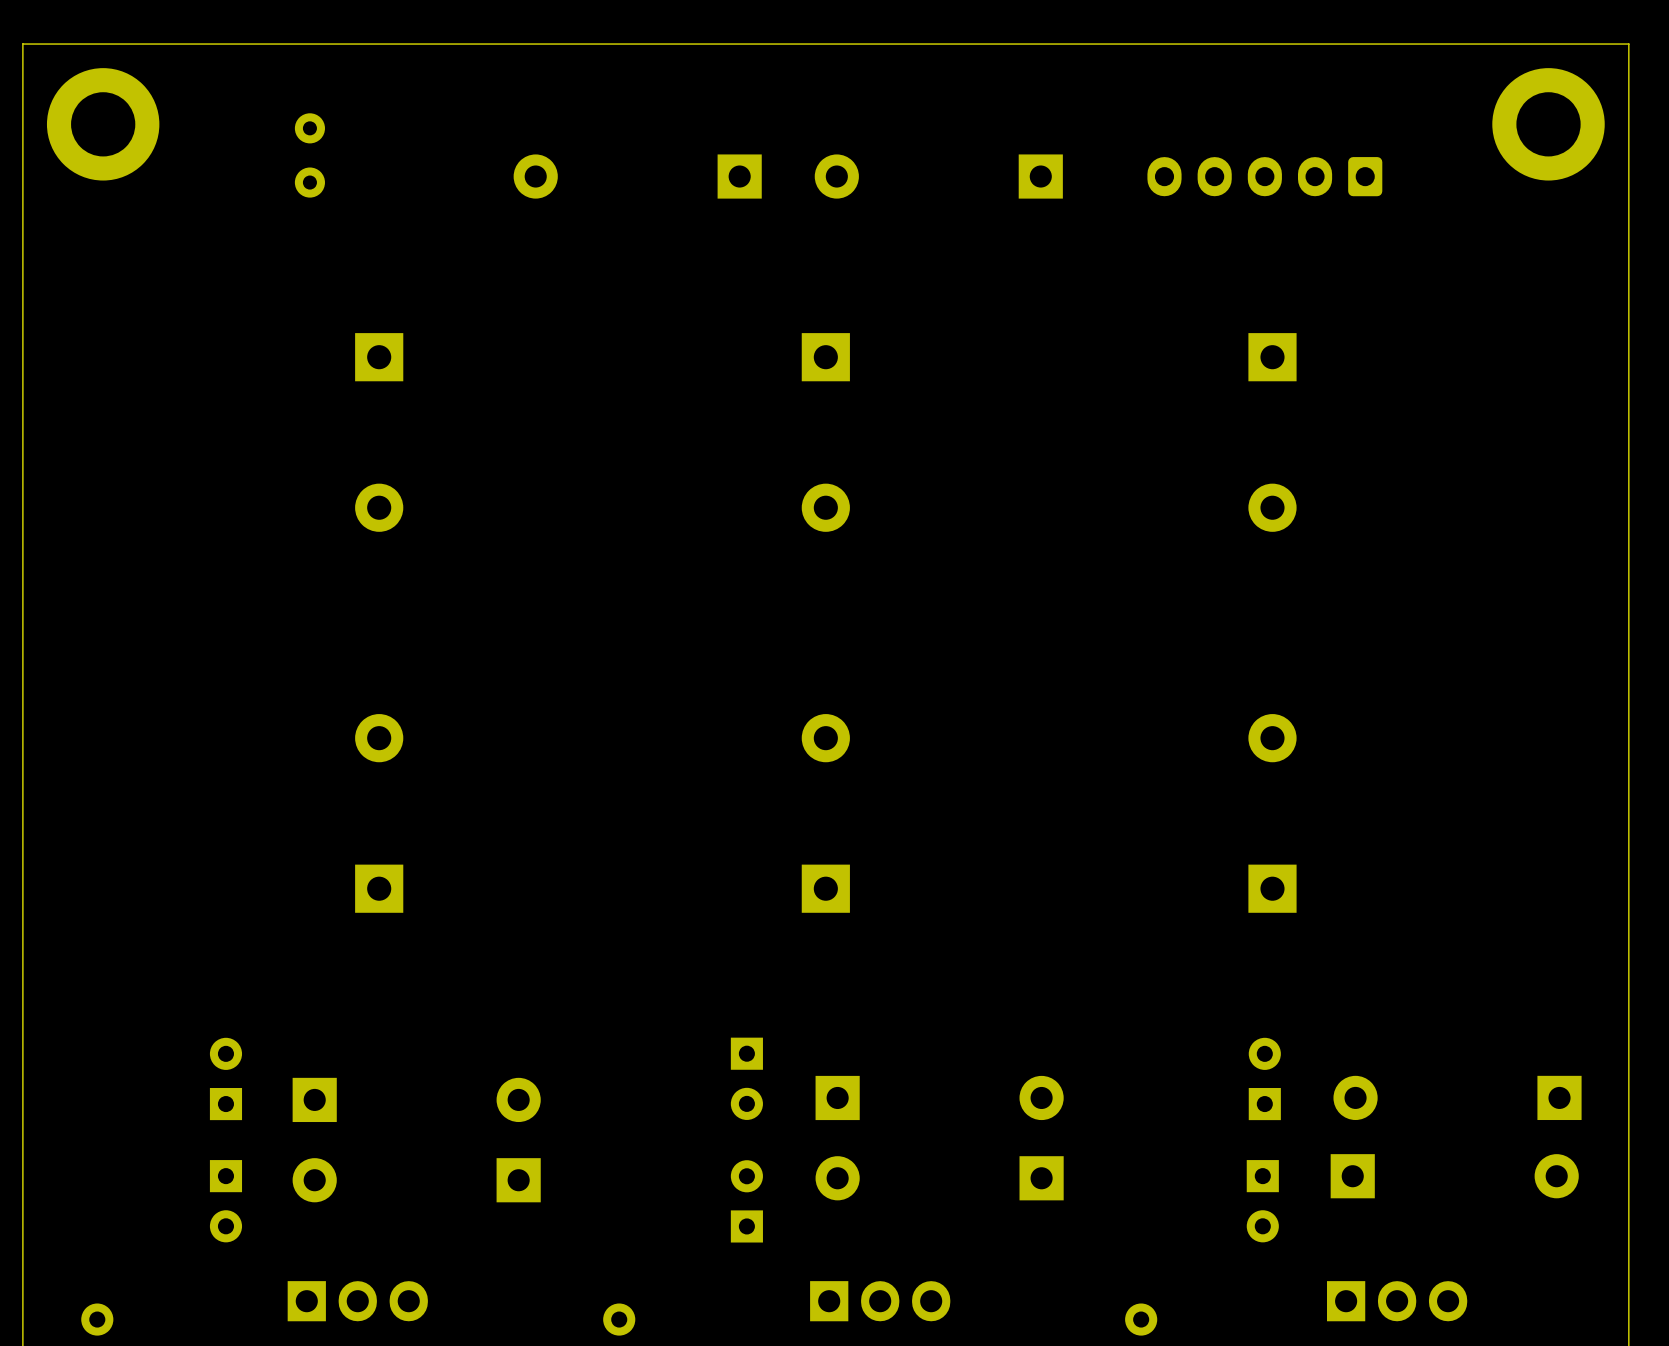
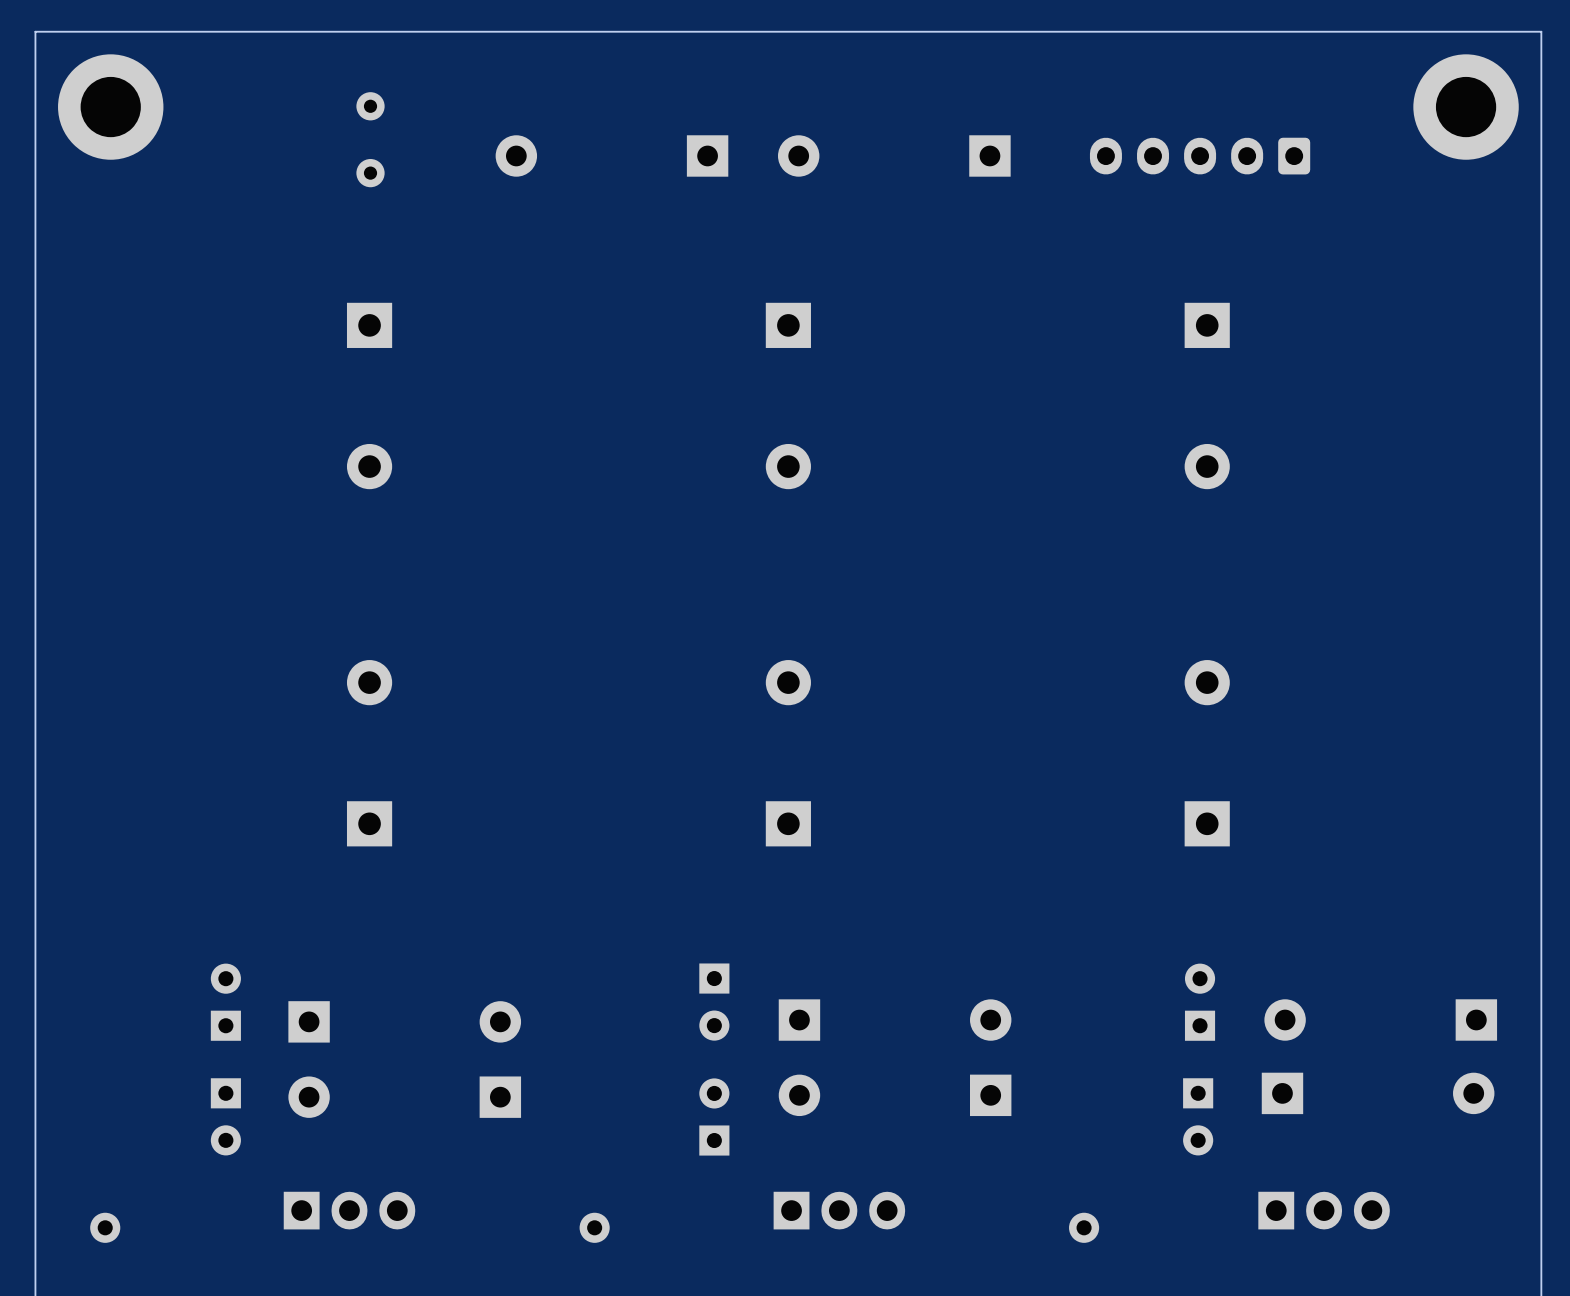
part: none -> (370, 106)
part: (309, 128) -> none
part: (309, 182) -> none
part: none -> (370, 173)

